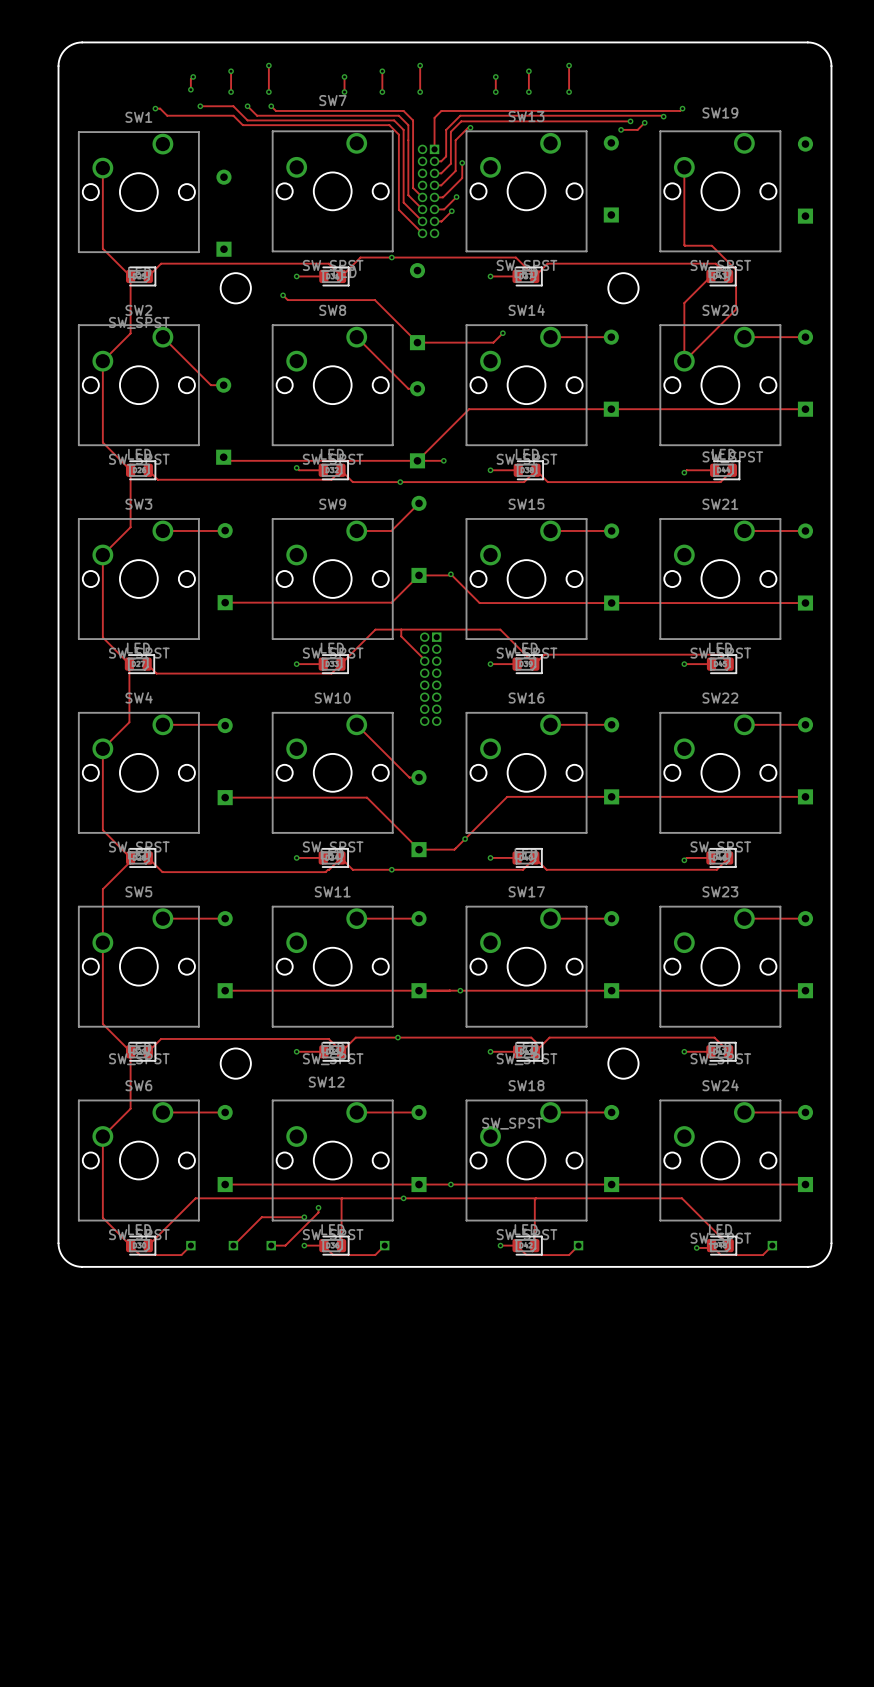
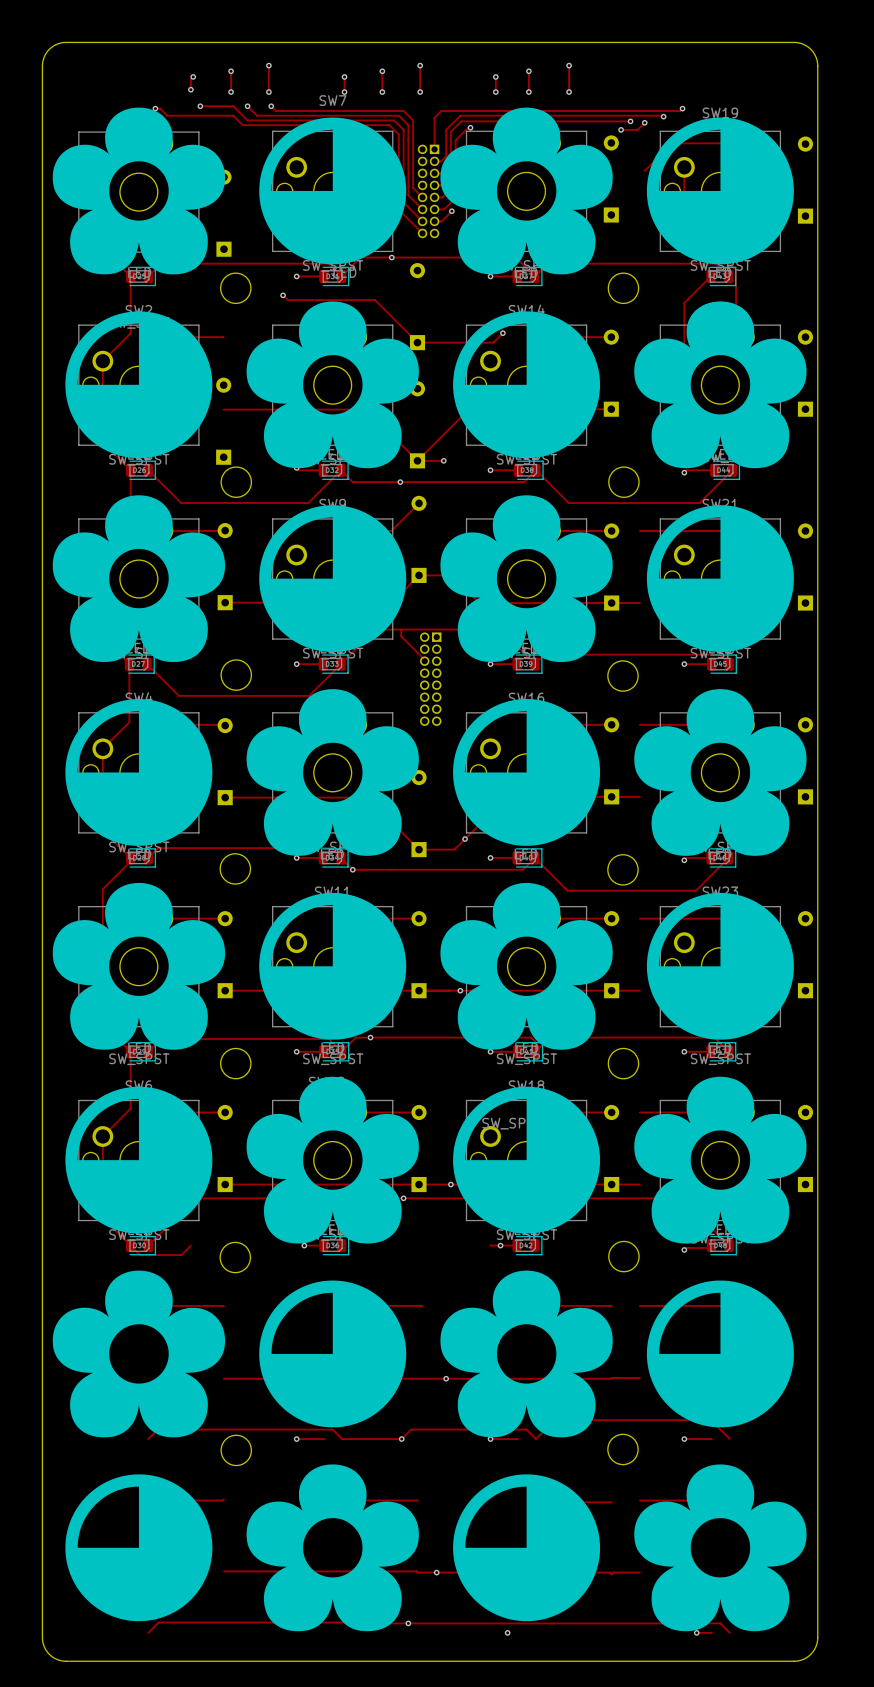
board edge: (82, 42) (71, 44) (65, 49) (60, 55) (58, 66) (58, 1243) (62, 1255) (71, 1264) (82, 1266) (807, 1266) (818, 1264) (824, 1259) (829, 1253) (831, 1243) (831, 66) (827, 53) (820, 46) (810, 42) (794, 42) -> (82, 42) (63, 42) (53, 46) (46, 53) (42, 66) (42, 1637) (43, 1645) (49, 1654) (58, 1659) (66, 1661) (794, 1661) (806, 1657) (815, 1647) (817, 1637) (817, 66) (816, 58) (810, 49) (801, 43) (794, 42)
drawing: none -> [52, 107, 226, 275]
drawing: none -> [440, 107, 613, 275]
drawing: none -> [259, 117, 407, 265]
drawing: none -> [646, 117, 794, 265]
track: none -> (744, 143) (672, 143) (644, 170)
drawing: none -> [246, 301, 419, 469]
drawing: none -> [634, 301, 807, 469]
drawing: none -> [65, 311, 213, 459]
drawing: none -> [453, 311, 601, 459]
track: (162, 337) (210, 385) (223, 385) -> (162, 337) (223, 337)
track: (744, 337) (805, 337) -> none
track: (611, 409) (805, 409) -> none
track: (227, 460) (417, 460) -> (223, 409) (366, 409) (417, 460)
round board edge: none -> [220, 466, 252, 498]
round board edge: none -> [608, 466, 640, 498]
track: (157, 479) (331, 479) -> (157, 479) (181, 503) (308, 503) (331, 479)
track: (547, 482) (720, 482) -> (547, 482) (568, 503) (699, 503) (720, 482)
drawing: none -> [52, 495, 226, 663]
drawing: none -> [440, 495, 613, 663]
drawing: none -> [259, 505, 407, 652]
drawing: none -> [646, 505, 794, 652]
track: (744, 530) (805, 530) -> (744, 530) (640, 530)
track: (640, 603) (805, 603) -> none
round board edge: none -> [220, 659, 252, 691]
round board edge: none -> [607, 660, 639, 692]
track: (156, 673) (331, 673) -> (156, 673) (178, 695) (309, 695) (331, 673)
drawing: none -> [246, 689, 419, 856]
drawing: none -> [634, 689, 807, 856]
drawing: none -> [65, 699, 213, 846]
drawing: none -> [453, 699, 601, 846]
track: (744, 724) (805, 724) -> (744, 724) (640, 724)
track: (640, 796) (805, 796) -> none
round board edge: none -> [219, 853, 251, 885]
round board edge: none -> [607, 854, 639, 886]
track: (148, 857) (162, 872) (325, 872) (340, 857) -> (148, 857) (158, 848) (331, 848) (340, 857)
via position: (391, 869) -> (352, 869)
track: (546, 869) (716, 869) -> (546, 869) (567, 890) (695, 890) (716, 869)
drawing: none -> [52, 882, 226, 1050]
drawing: none -> [440, 882, 613, 1050]
drawing: none -> [259, 892, 407, 1040]
drawing: none -> [646, 892, 794, 1040]
track: (744, 918) (805, 918) -> (744, 918) (640, 918)
track: (640, 990) (805, 990) -> none
via position: (397, 1037) -> (370, 1037)
drawing: none -> [246, 1076, 419, 1244]
drawing: none -> [634, 1076, 807, 1244]
drawing: none -> [65, 1086, 213, 1234]
drawing: none -> [453, 1086, 601, 1234]
track: (744, 1112) (805, 1112) -> (744, 1112) (640, 1112)
track: (640, 1184) (805, 1184) -> none
track: (318, 1207) (318, 1212) (285, 1245) (271, 1245) -> none
via: (318, 1207) -> none
track: (304, 1217) (261, 1217) (233, 1245) -> none
via: (304, 1217) -> none
round board edge: none -> [608, 1241, 640, 1272]
round board edge: none -> [219, 1242, 251, 1273]
part: (190, 1245) -> none
part: (233, 1245) -> none
part: (271, 1245) -> none
track: (323, 1245) (333, 1255) (375, 1255) (384, 1245) -> none
part: (384, 1245) -> none
track: none -> (490, 1245) (500, 1245)
track: (517, 1245) (526, 1255) (569, 1255) (578, 1245) -> none
part: (578, 1245) -> none
track: (711, 1245) (720, 1255) (762, 1255) (772, 1245) -> none
part: (772, 1245) -> none
track: none -> (696, 1247) (686, 1247) (684, 1249)
via position: (696, 1247) -> (684, 1249)
drawing: none -> [52, 1270, 226, 1438]
drawing: none -> [440, 1270, 613, 1438]
drawing: none -> [259, 1280, 407, 1428]
drawing: none -> [646, 1280, 794, 1428]
track: none -> (162, 1305) (223, 1306)
track: none -> (356, 1305) (422, 1306)
track: none -> (550, 1305) (611, 1306)
track: none -> (640, 1305) (744, 1305)
track: none -> (640, 1377) (223, 1378)
via: none -> (446, 1378)
round board edge: none -> [607, 1434, 639, 1465]
round board edge: none -> [220, 1435, 252, 1466]
track: none -> (148, 1439) (157, 1429) (332, 1429) (342, 1439) (401, 1439) (411, 1429) (526, 1429) (535, 1439) (554, 1420) (710, 1420) (729, 1439)
track: none -> (296, 1439) (324, 1439)
via: none -> (296, 1439)
via: none -> (401, 1439)
track: none -> (490, 1439) (518, 1439)
via: none -> (490, 1439)
track: none -> (684, 1439) (712, 1439)
via: none -> (684, 1439)
drawing: none -> [246, 1464, 419, 1632]
drawing: none -> [634, 1464, 807, 1632]
drawing: none -> [65, 1474, 213, 1622]
drawing: none -> [453, 1474, 601, 1622]
track: none -> (223, 1499) (162, 1500)
track: none -> (356, 1499) (417, 1500)
track: none -> (550, 1499) (553, 1502) (611, 1502)
track: none -> (640, 1500) (745, 1500)
track: none -> (223, 1571) (609, 1572) (611, 1574) (613, 1572) (640, 1572)
via: none -> (436, 1572)
via: none -> (408, 1623)
track: none -> (148, 1632) (158, 1622) (720, 1623) (729, 1632)
via: none -> (507, 1632)
track: none -> (696, 1632) (712, 1632)
via: none -> (696, 1632)

